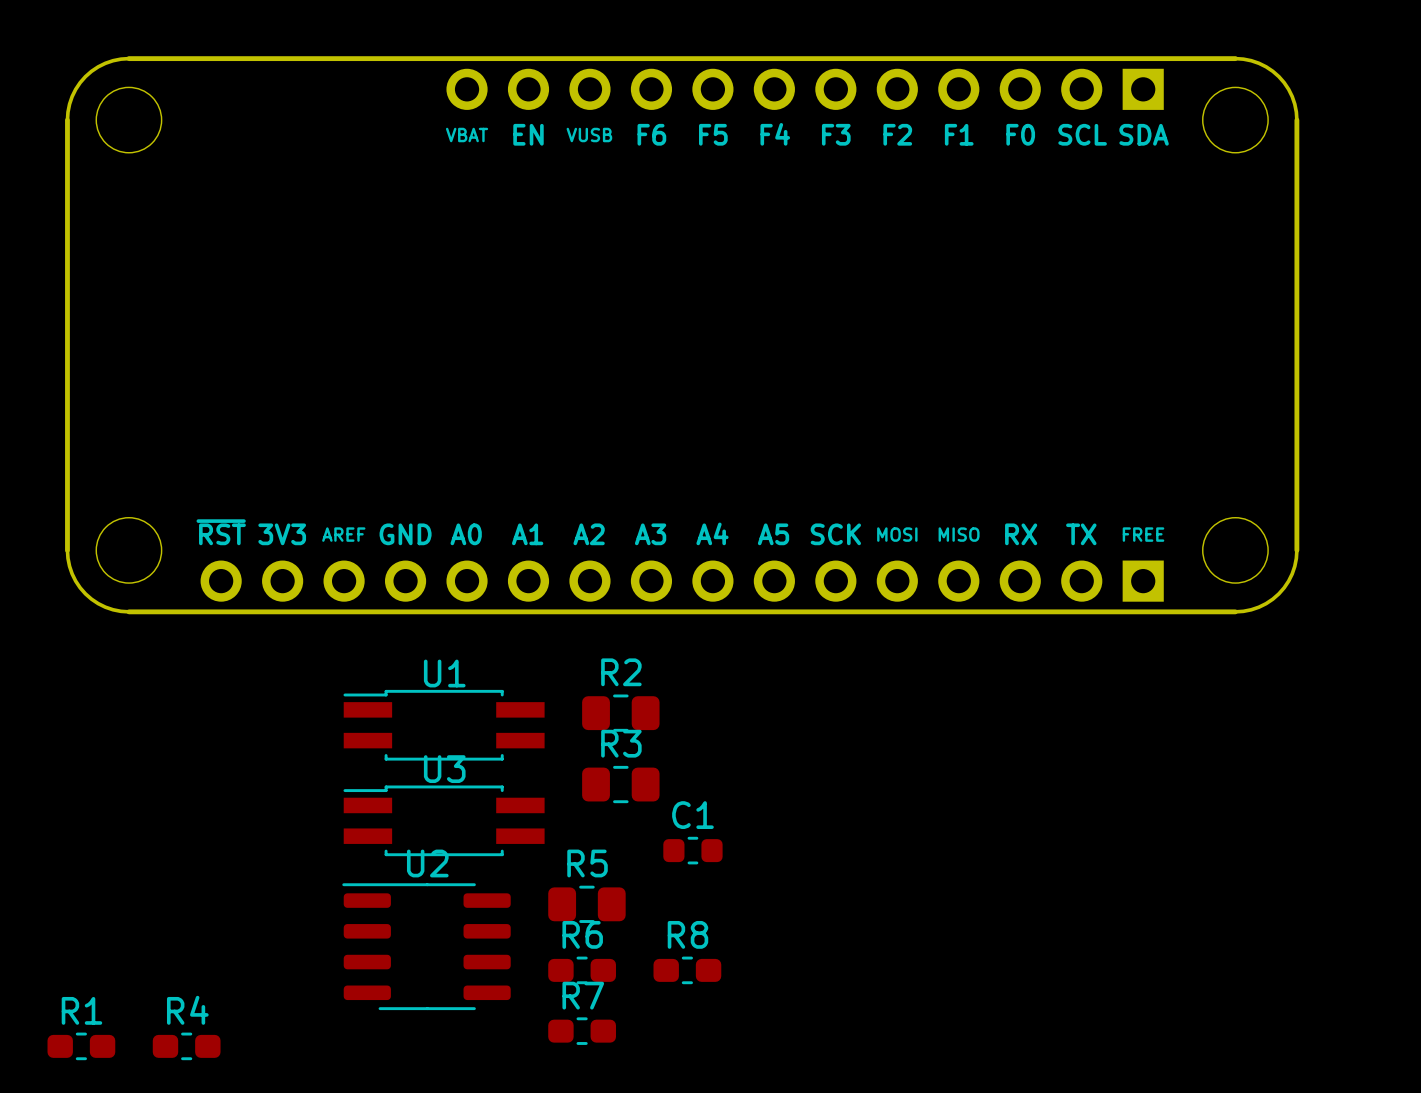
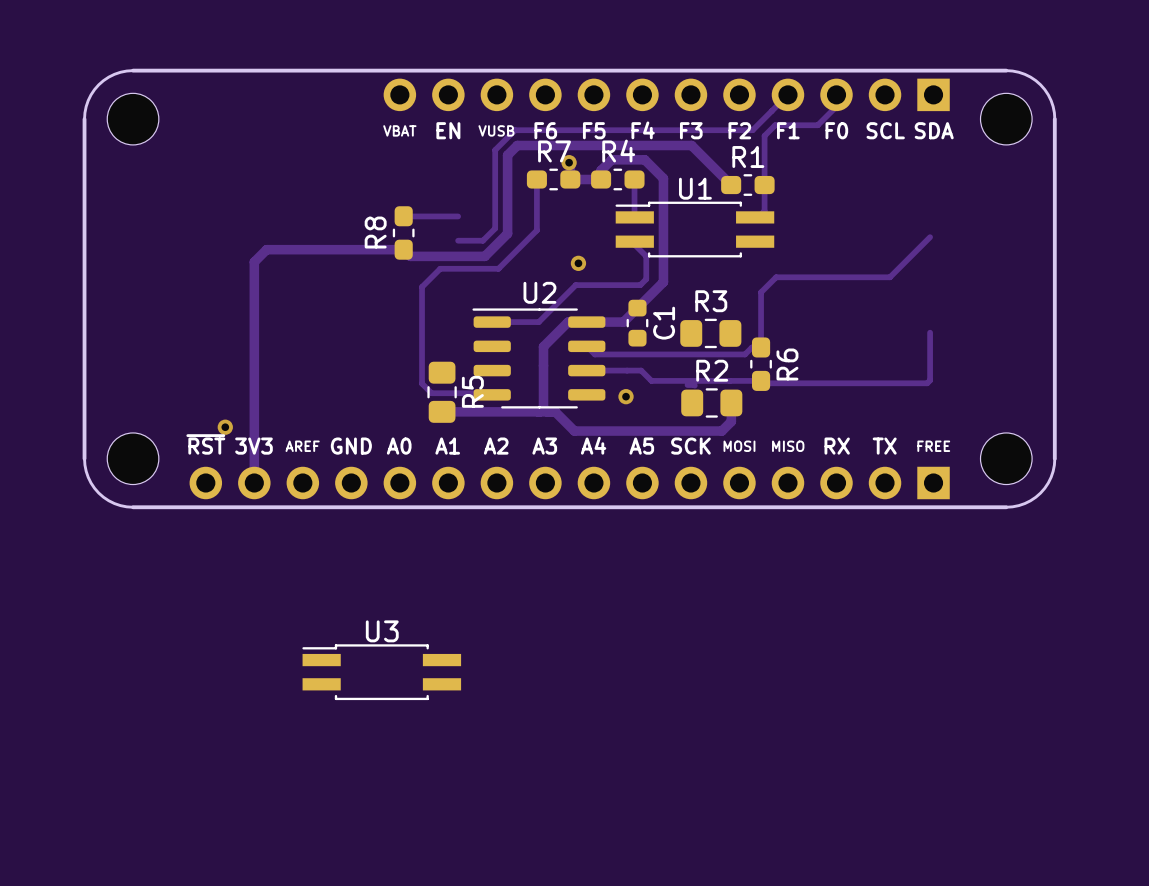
track: none -> (787, 94) (752, 130) (515, 130) (495, 150) (495, 228) (482, 240) (458, 240)
track: none -> (836, 94) (836, 106) (817, 125) (775, 125) (764, 135) (764, 210) (758, 217) (755, 217)
track: none -> (569, 162) (570, 179) (601, 179) (601, 170) (611, 159) (644, 159) (663, 178) (663, 282) (623, 322) (568, 322) (543, 346) (543, 408)
via: none -> (569, 162)
track: none -> (536, 179) (536, 230) (498, 268) (440, 268) (422, 287) (422, 383) (431, 393) (490, 393) (492, 394)
track: none -> (634, 179) (634, 217)
track: none -> (731, 185) (691, 145) (517, 145) (507, 155) (507, 233) (484, 256) (410, 256) (403, 249) (266, 249) (254, 262) (254, 482)
track: none -> (403, 216) (458, 216)
track: none -> (930, 237) (889, 277) (776, 277) (761, 292) (761, 347) (751, 347) (745, 354) (594, 354) (586, 346)
track: none -> (623, 241) (634, 241) (634, 244) (646, 256) (646, 279) (640, 285) (575, 285) (538, 322) (492, 322)
via: none -> (578, 263)
track: none -> (930, 332) (930, 380) (927, 383) (651, 380) (641, 370) (586, 370)
track: none -> (687, 385) (694, 385)
via: none -> (626, 396)
track: none -> (731, 402) (731, 421) (721, 431) (574, 431) (555, 411) (442, 411)
via: none -> (225, 427)
R2 position: (620, 713) -> (711, 402)
U1 position: (444, 725) -> (694, 229)
R3 position: (620, 784) -> (710, 333)
C1 rotation: 0° (692, 850) -> 90° clockwise (637, 323)
C1 position: (692, 850) -> (637, 323)
R5 rotation: 0° (586, 904) -> 90° clockwise (442, 392)
R5 position: (586, 904) -> (442, 392)
R8 name position: R8 (687, 934) -> R8 (375, 232)
U2 position: (426, 946) -> (538, 358)
R6 rotation: 0° (582, 970) -> 90° clockwise (761, 364)
R6 position: (582, 970) -> (761, 364)
R8 rotation: 0° (687, 970) -> 90° clockwise (403, 232)
R8 position: (687, 970) -> (403, 232)
R7 position: (582, 1031) -> (553, 179)
R1 position: (81, 1046) -> (747, 185)
R4 position: (186, 1046) -> (617, 179)

